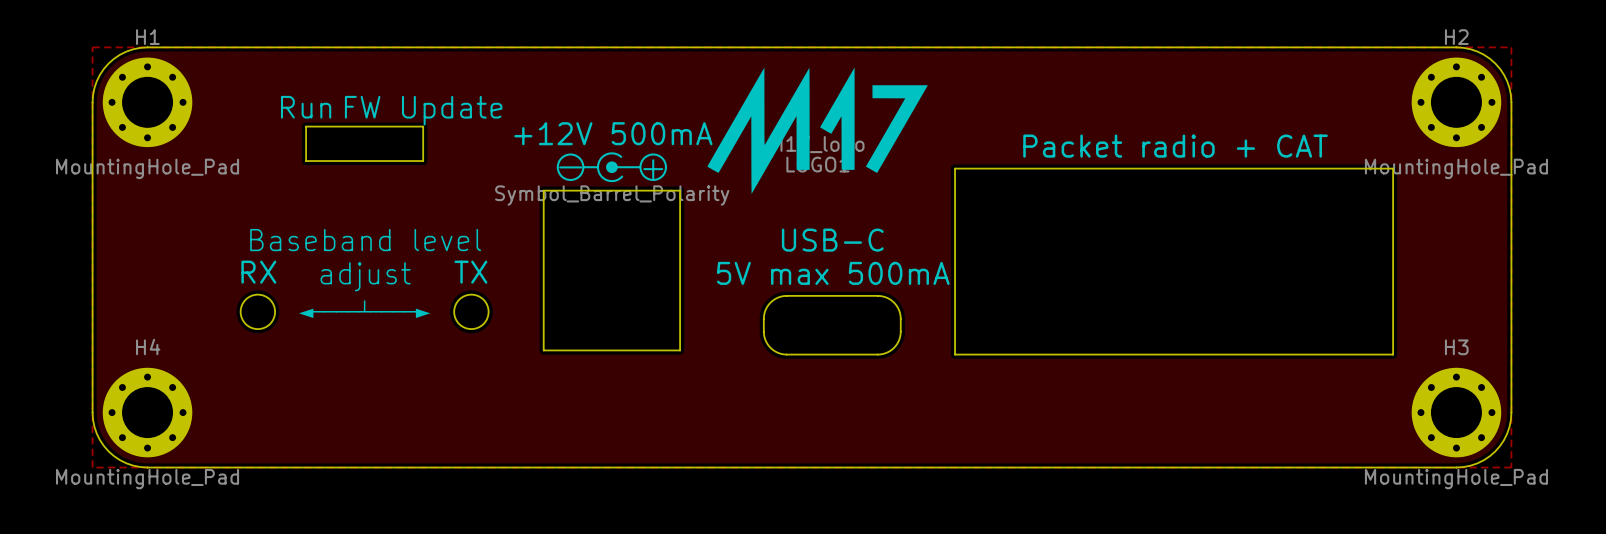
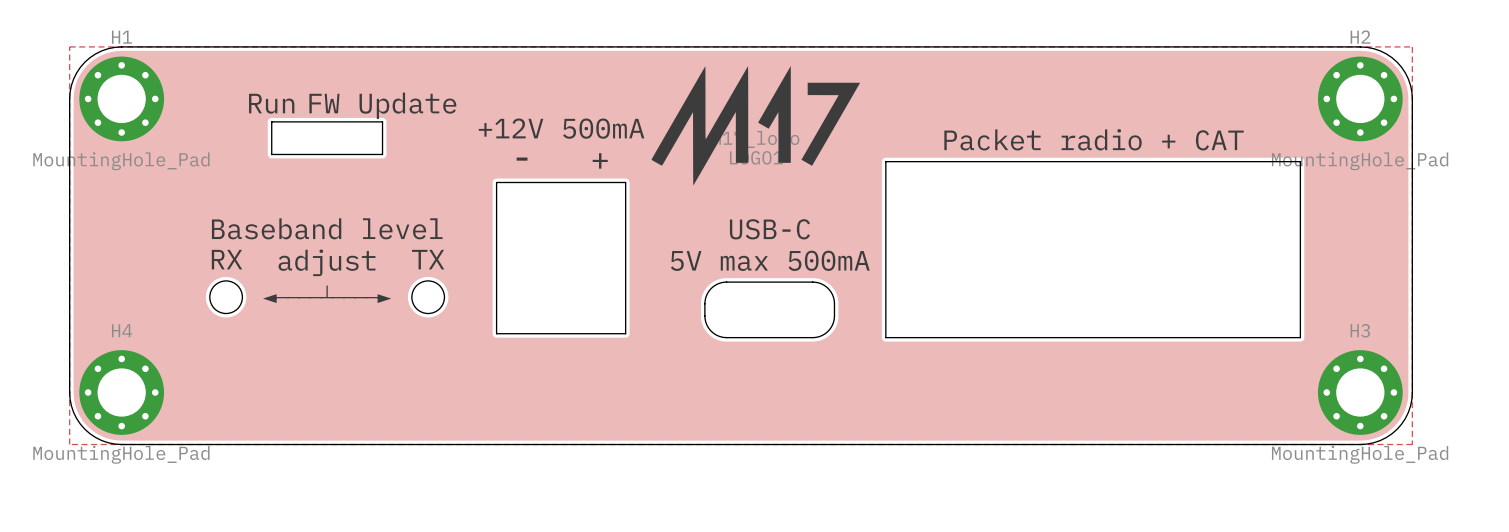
drawing: [556, 152, 668, 183] -> none

